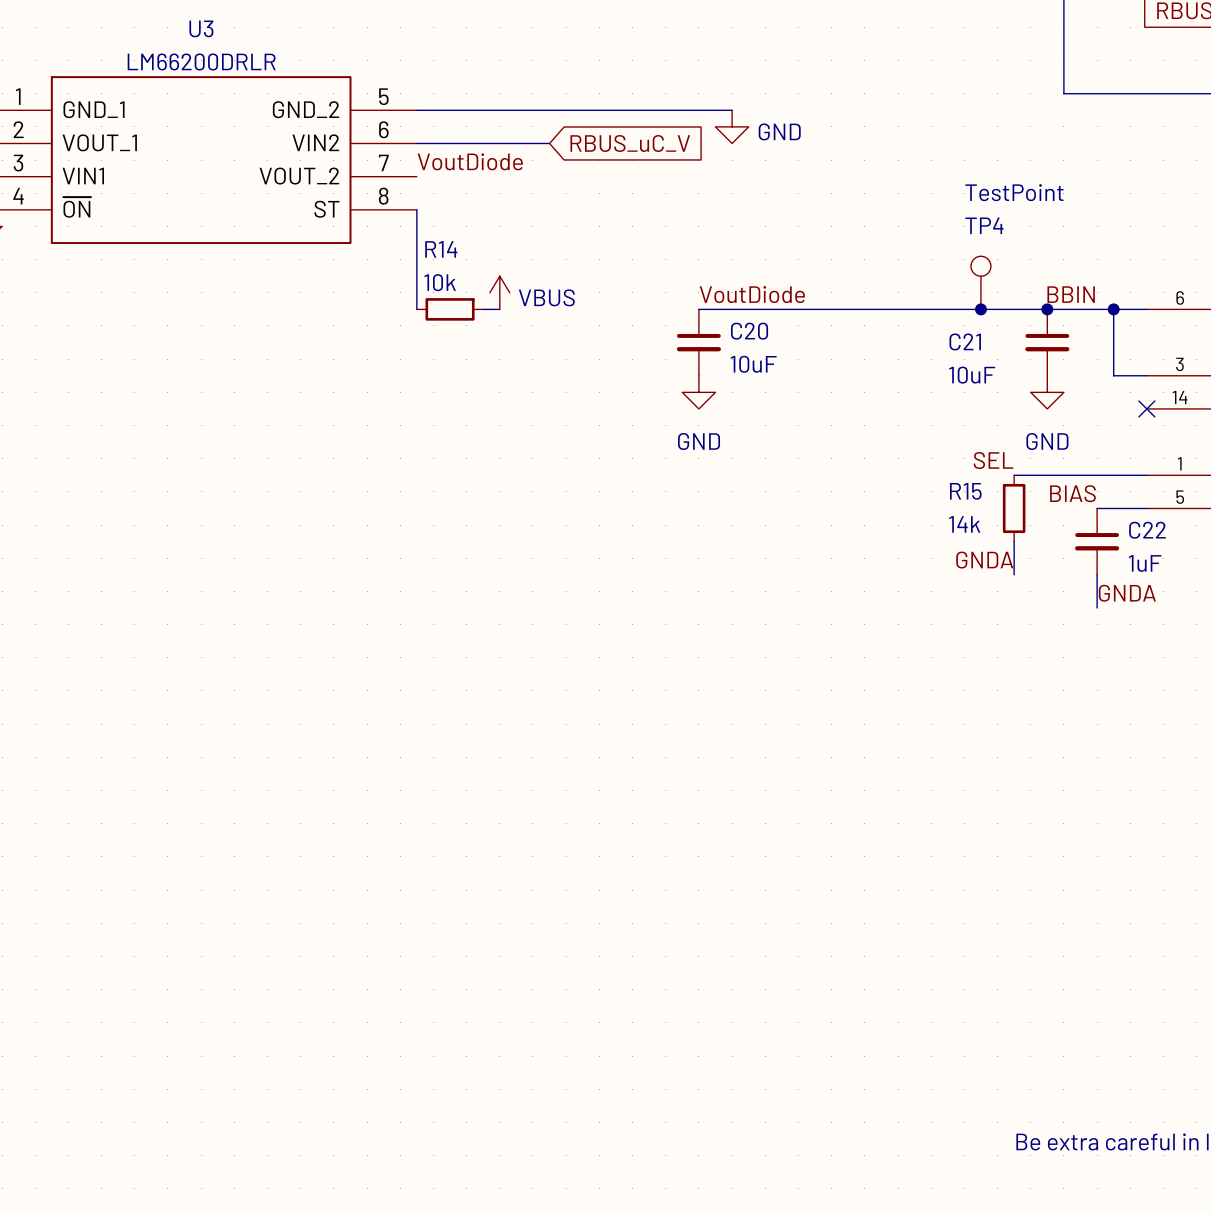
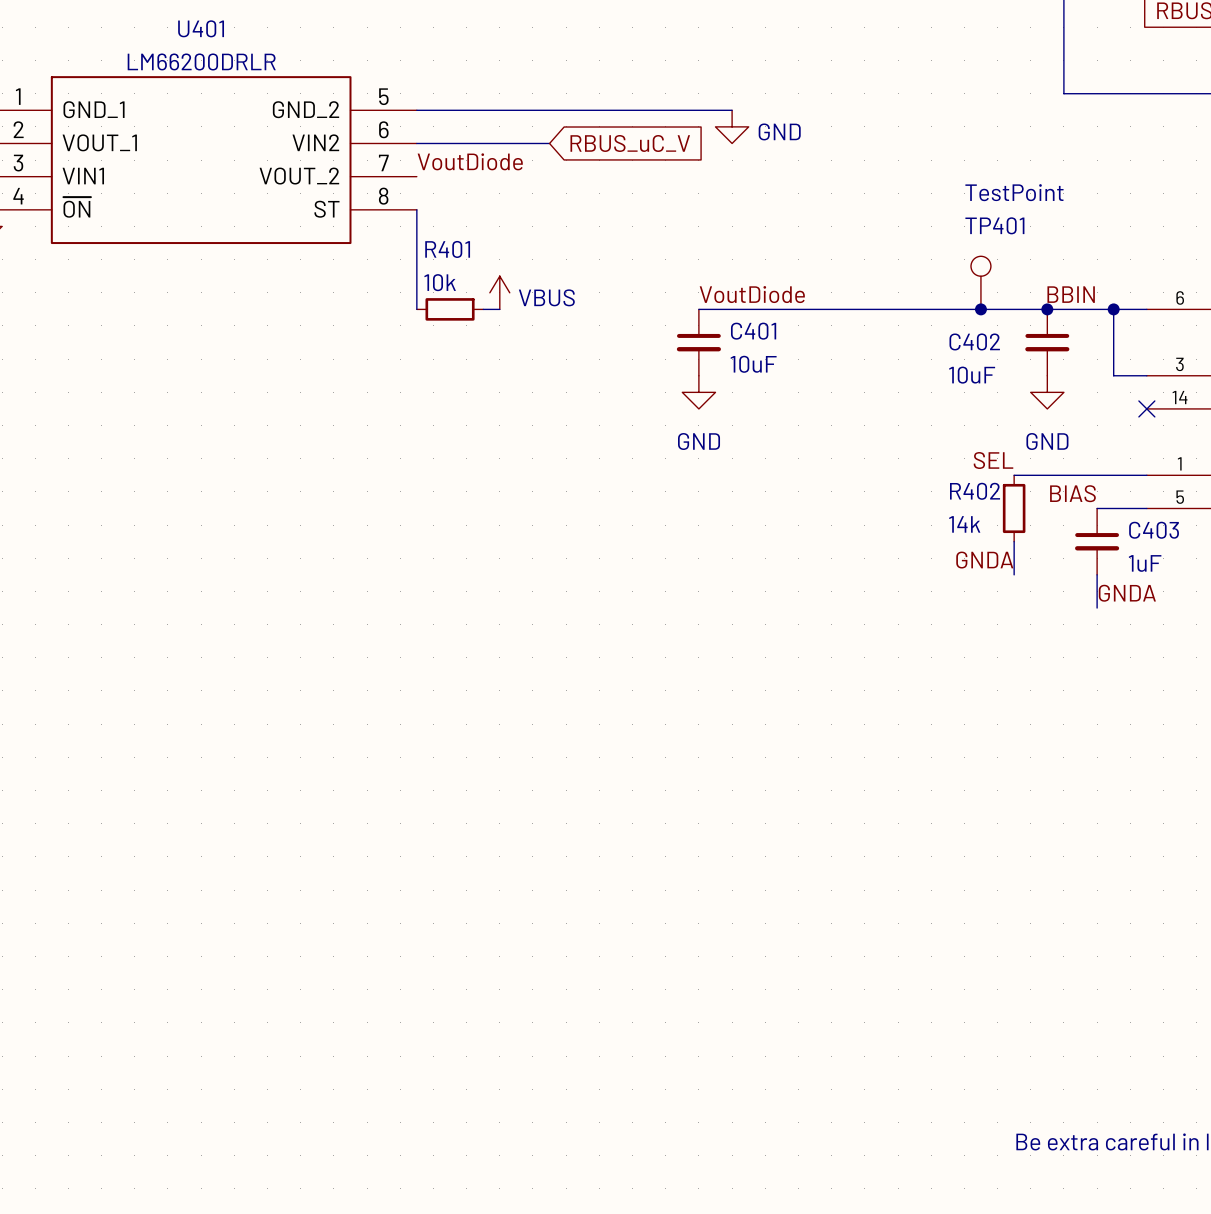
U3 name: U3 (201, 28) -> U401 (201, 28)
TP4 name: TP4 (984, 225) -> TP401 (994, 225)
R14 name: R14 (441, 249) -> R401 (447, 249)
C20 name: C20 (749, 331) -> C401 (753, 331)
C21 name: C21 (965, 341) -> C402 (974, 341)
R15 name: R15 (965, 491) -> R402 (975, 491)
C22 name: C22 (1147, 530) -> C403 (1154, 530)

